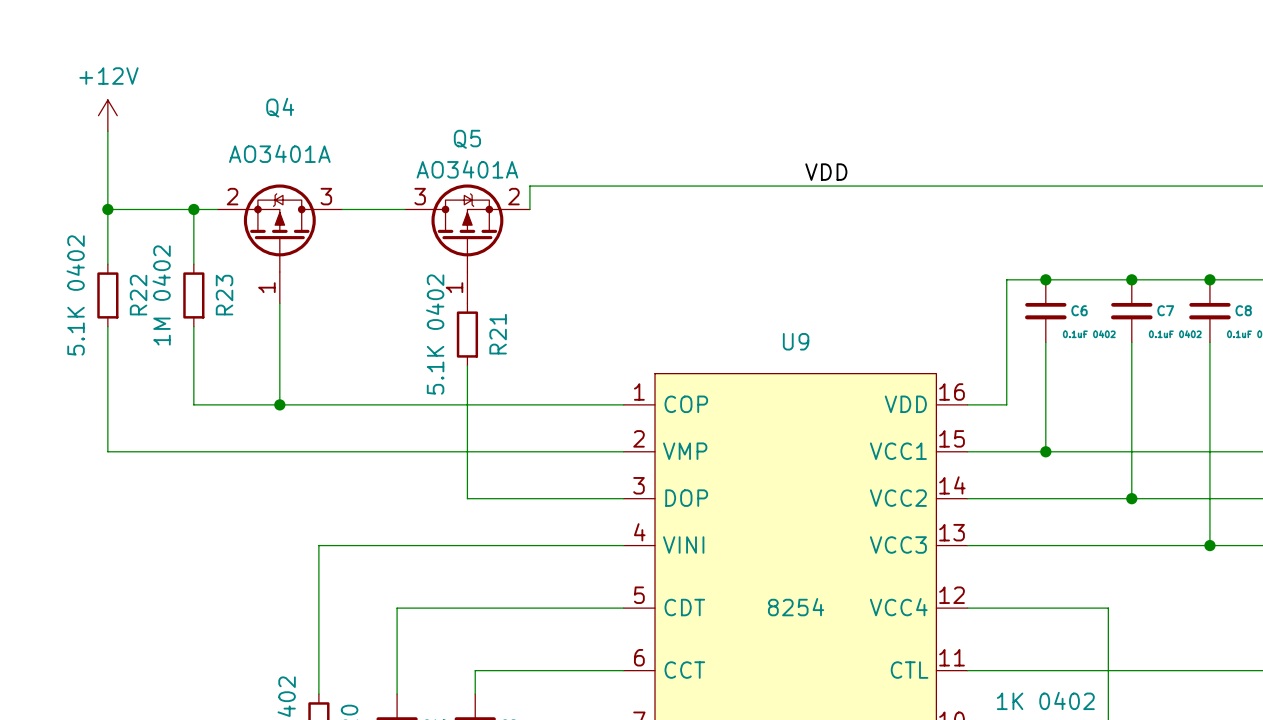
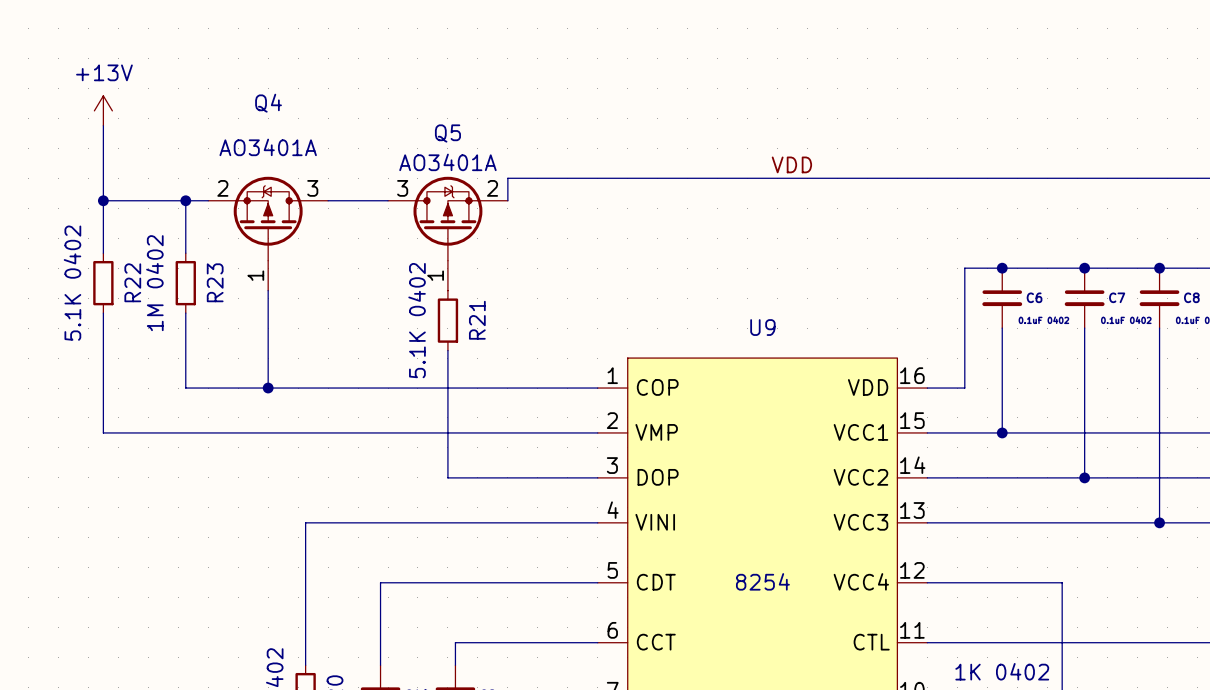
power symbol: +12V (107, 115) -> +13V (103, 110)

